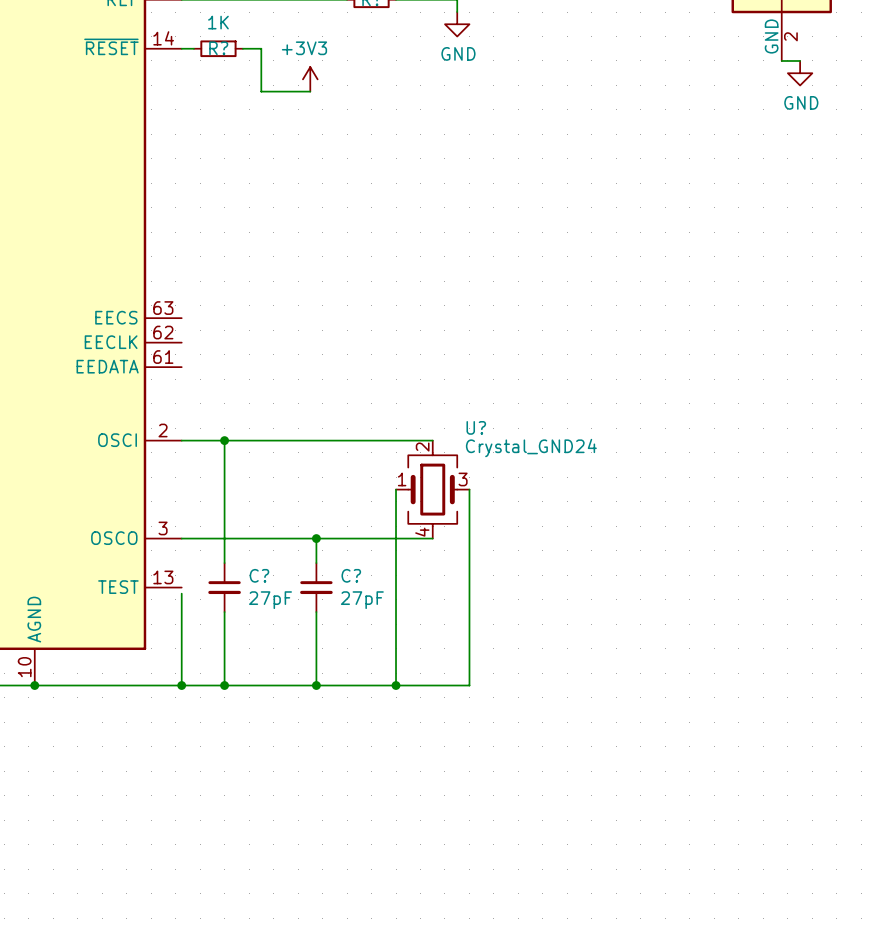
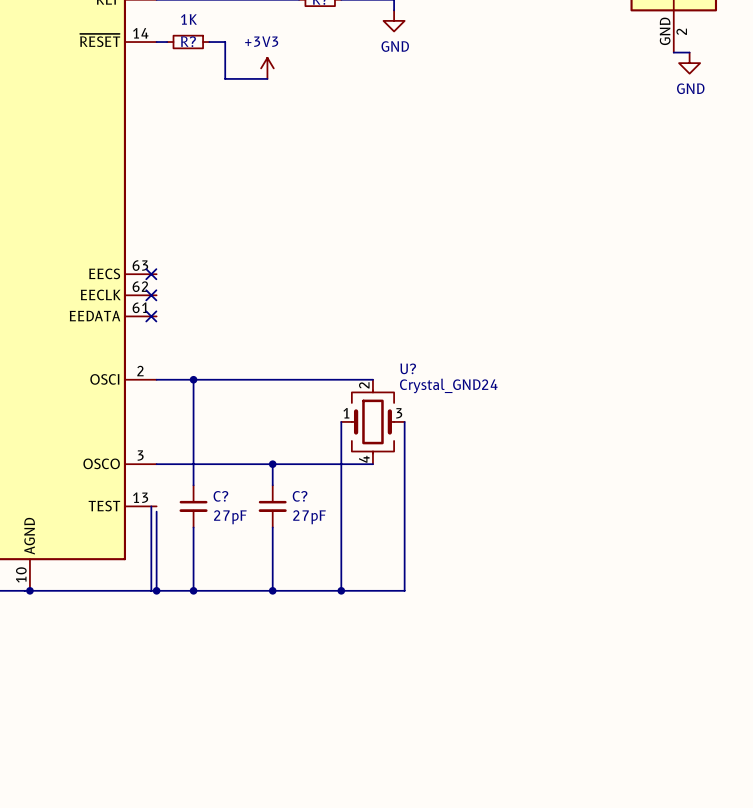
no-connect mark: none -> (151, 274)
no-connect mark: none -> (151, 295)
no-connect mark: none -> (151, 316)
wire: none -> (151, 506) (151, 590)

